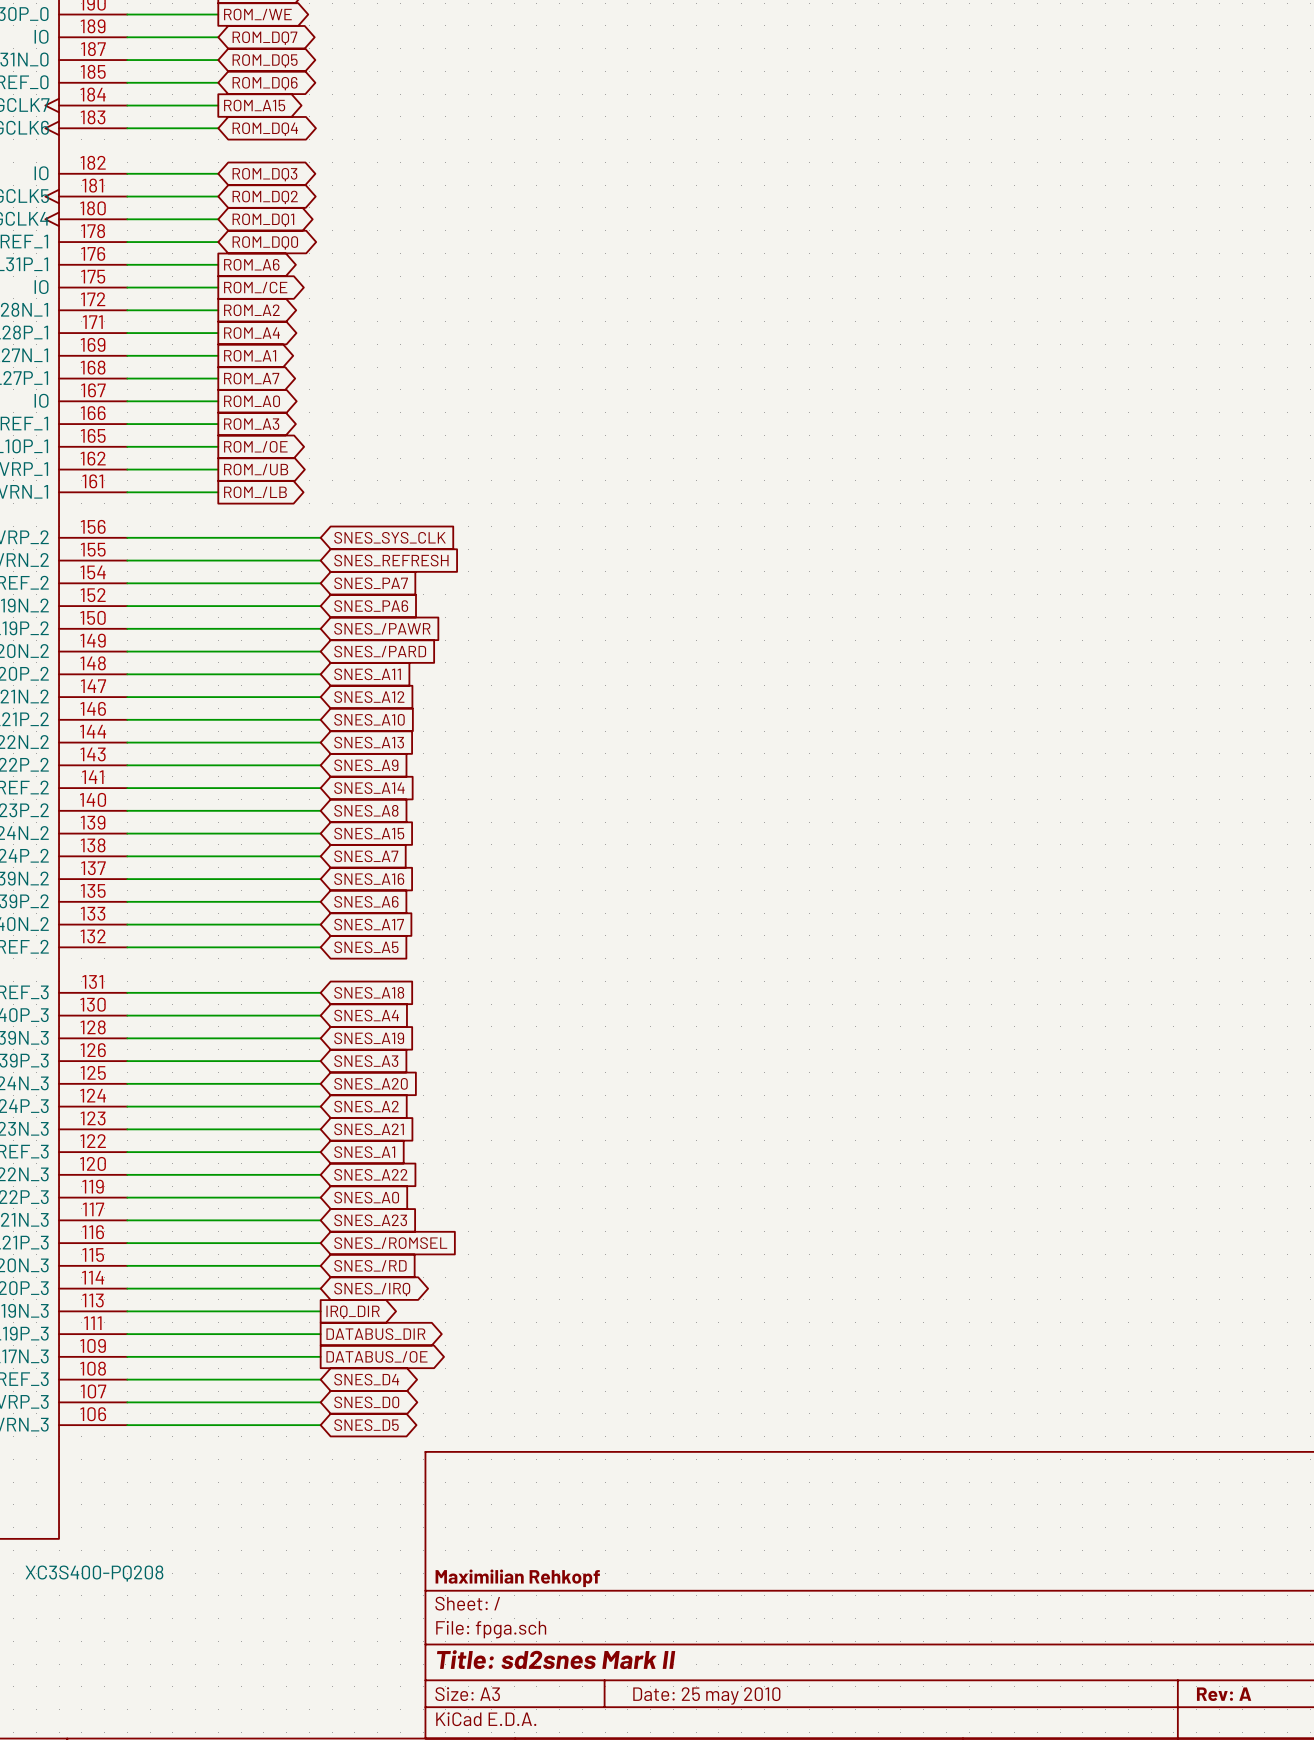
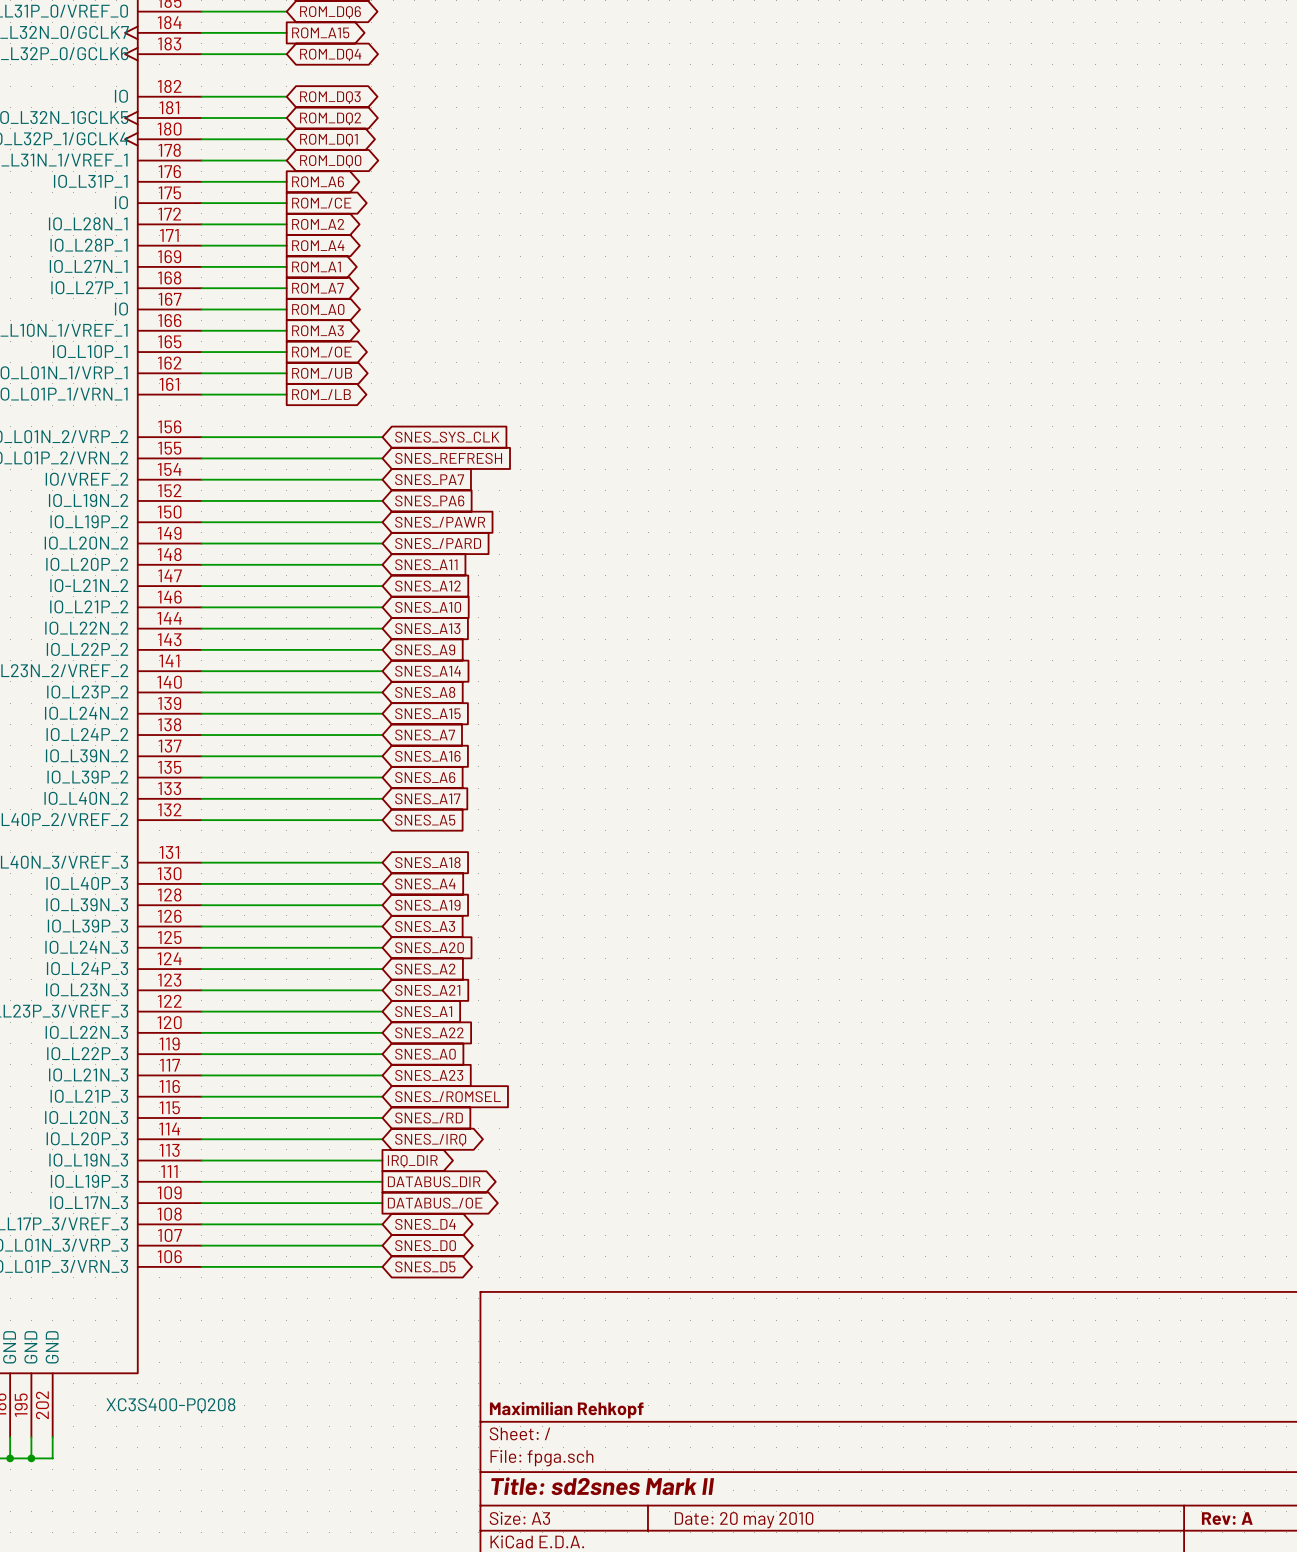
title block: Date: 25 may 2010 (706, 1695) -> Date: 20 may 2010 (744, 1520)

